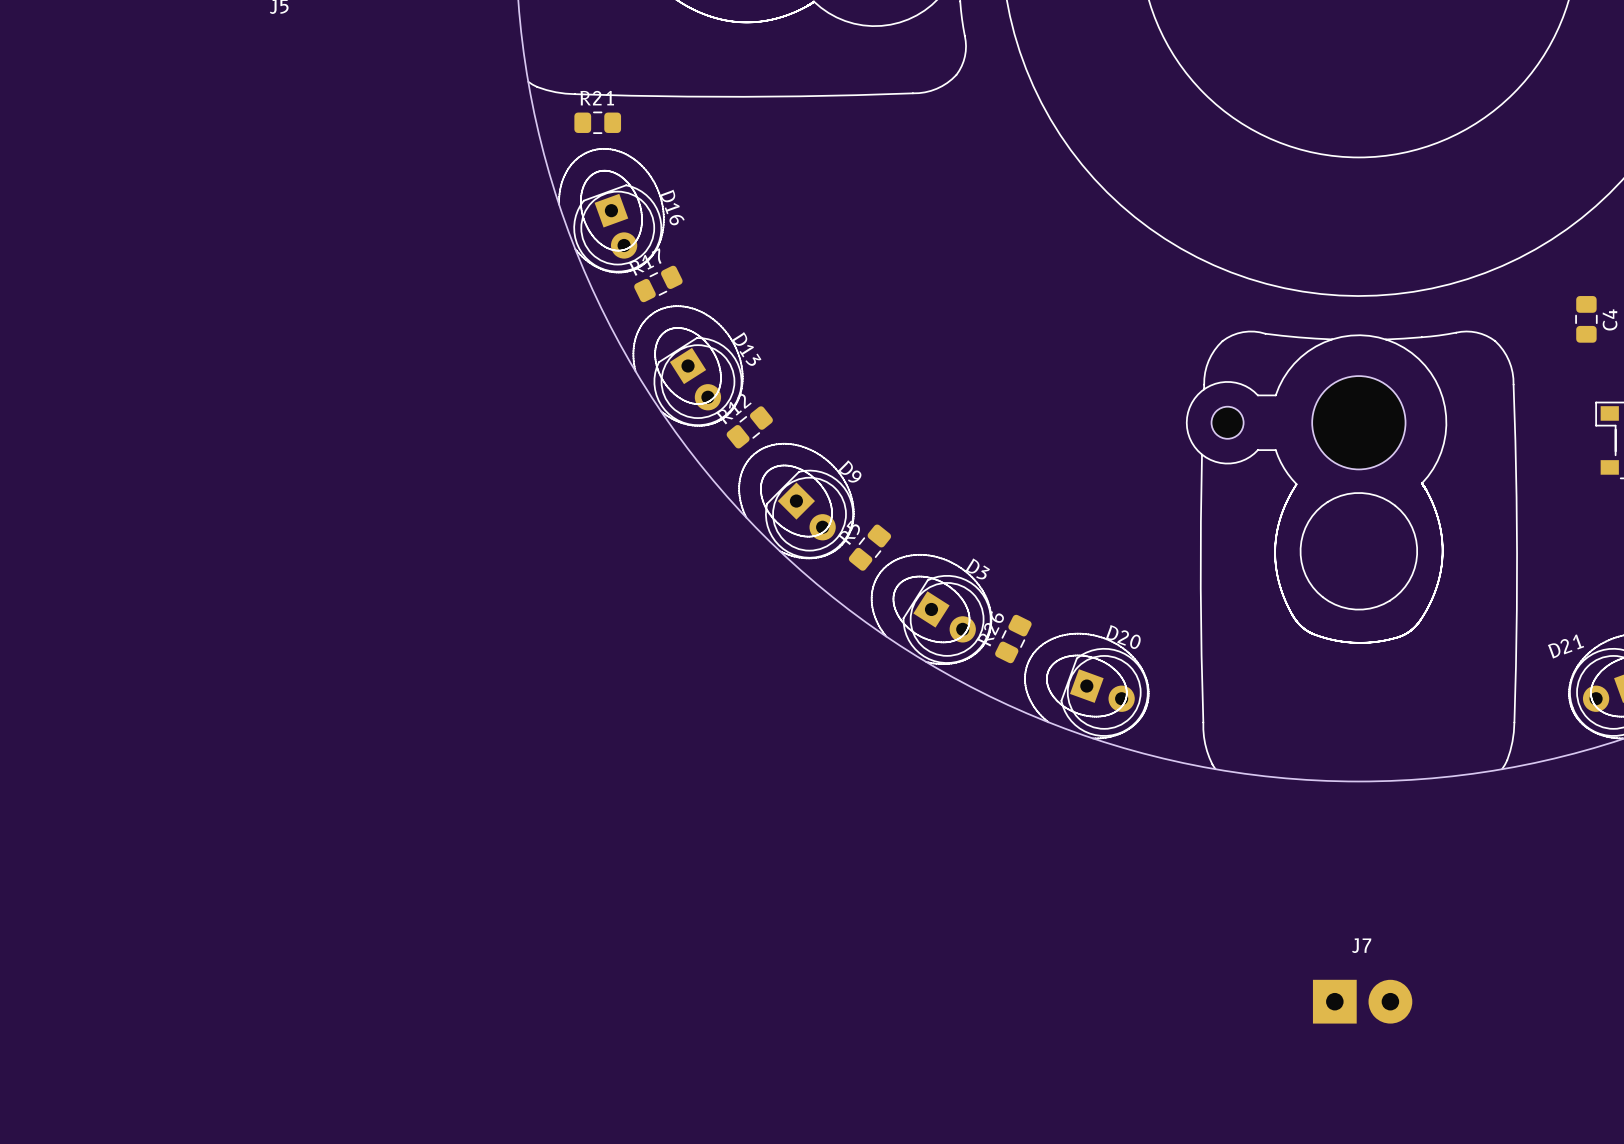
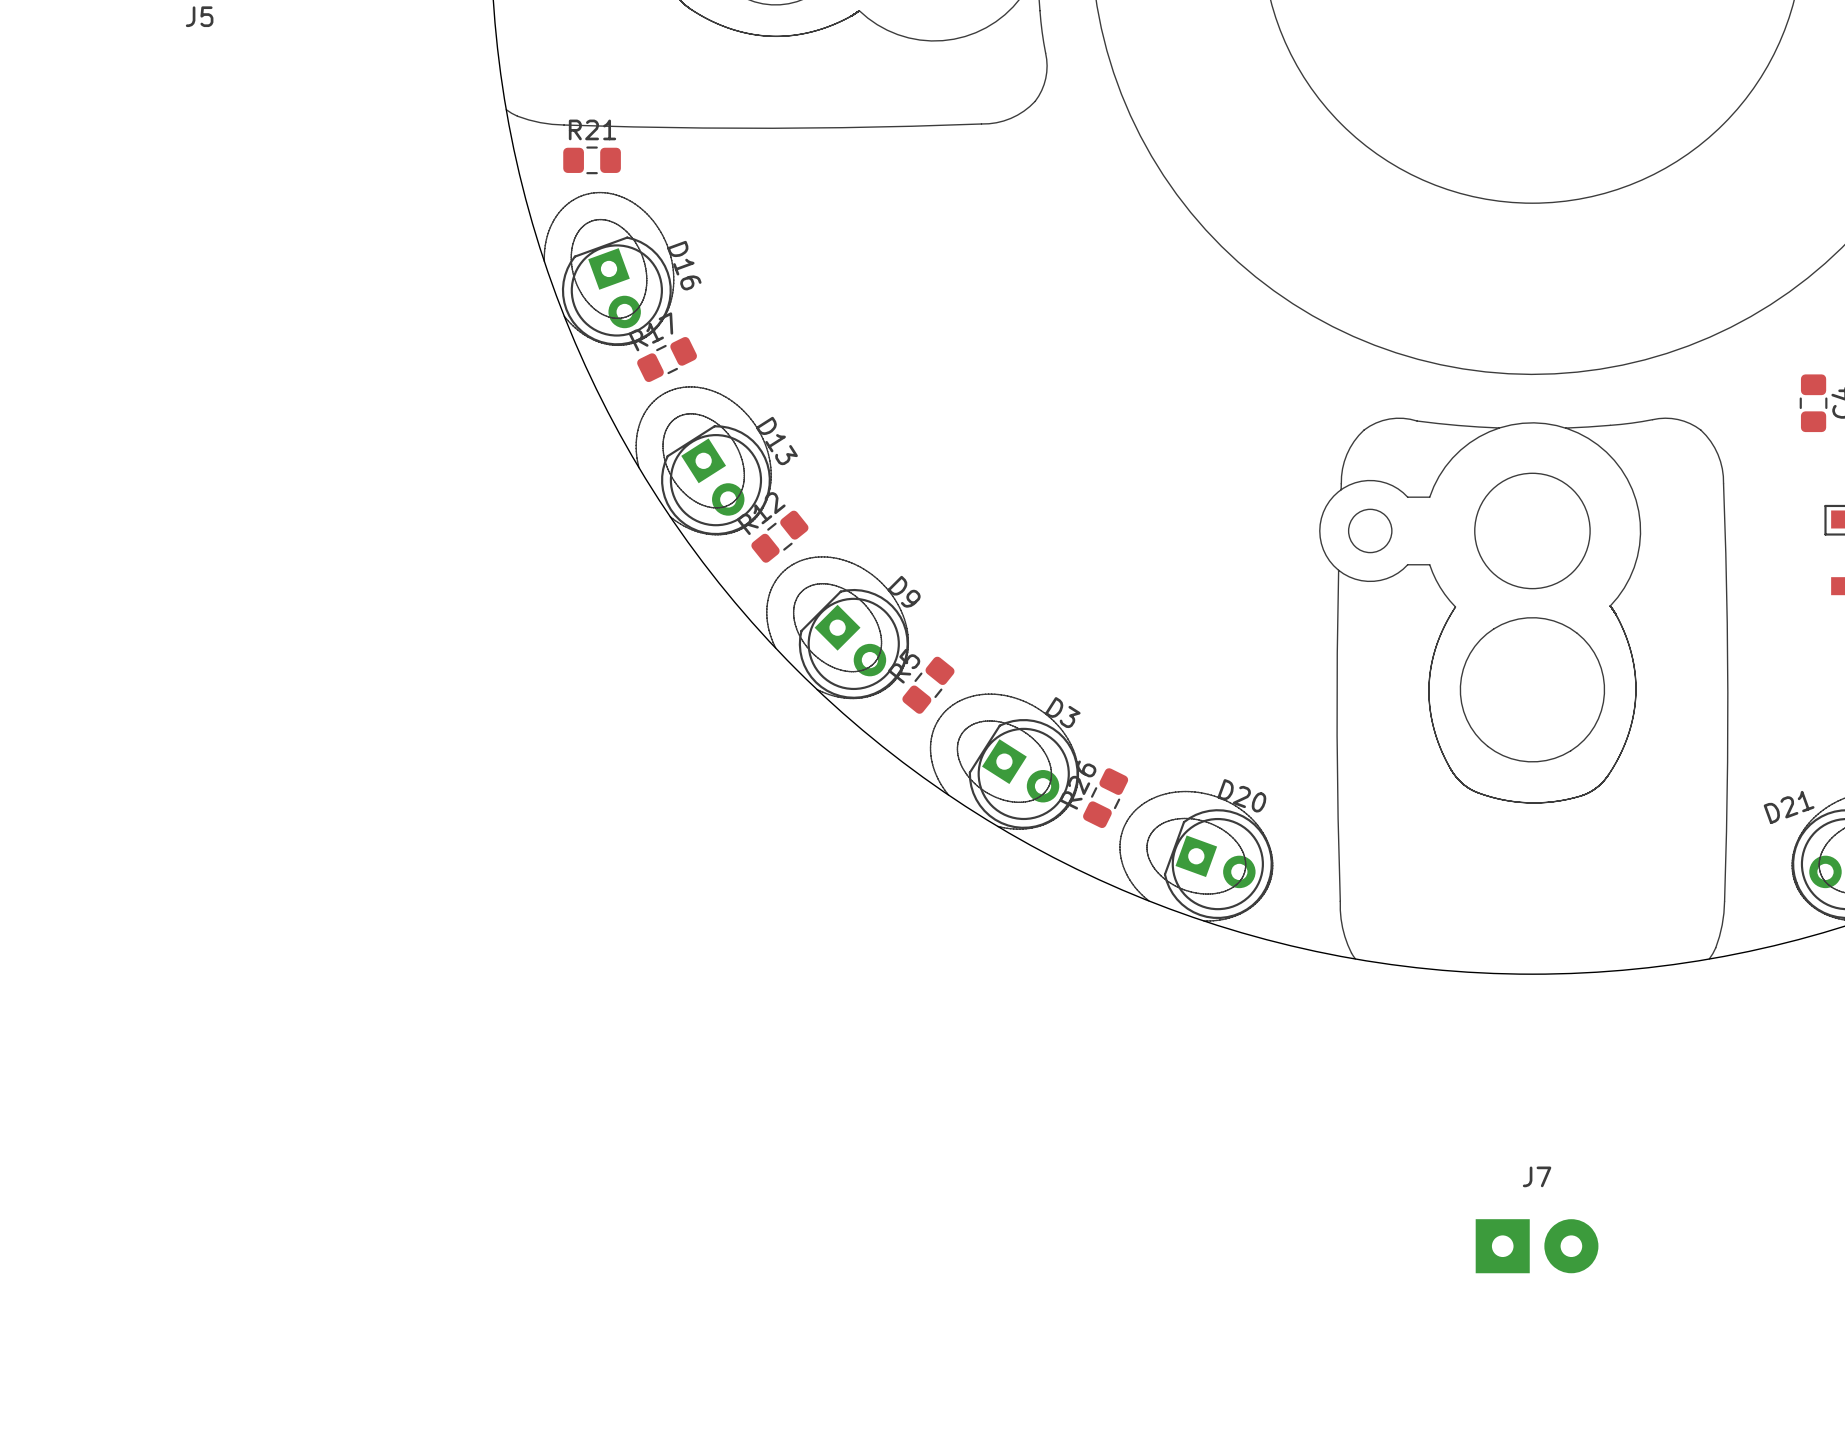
drawing: none -> [1474, 472, 1591, 590]
drawing: none -> [1348, 508, 1393, 554]
part: (1227, 422) -> none
part: (1358, 422) -> none

